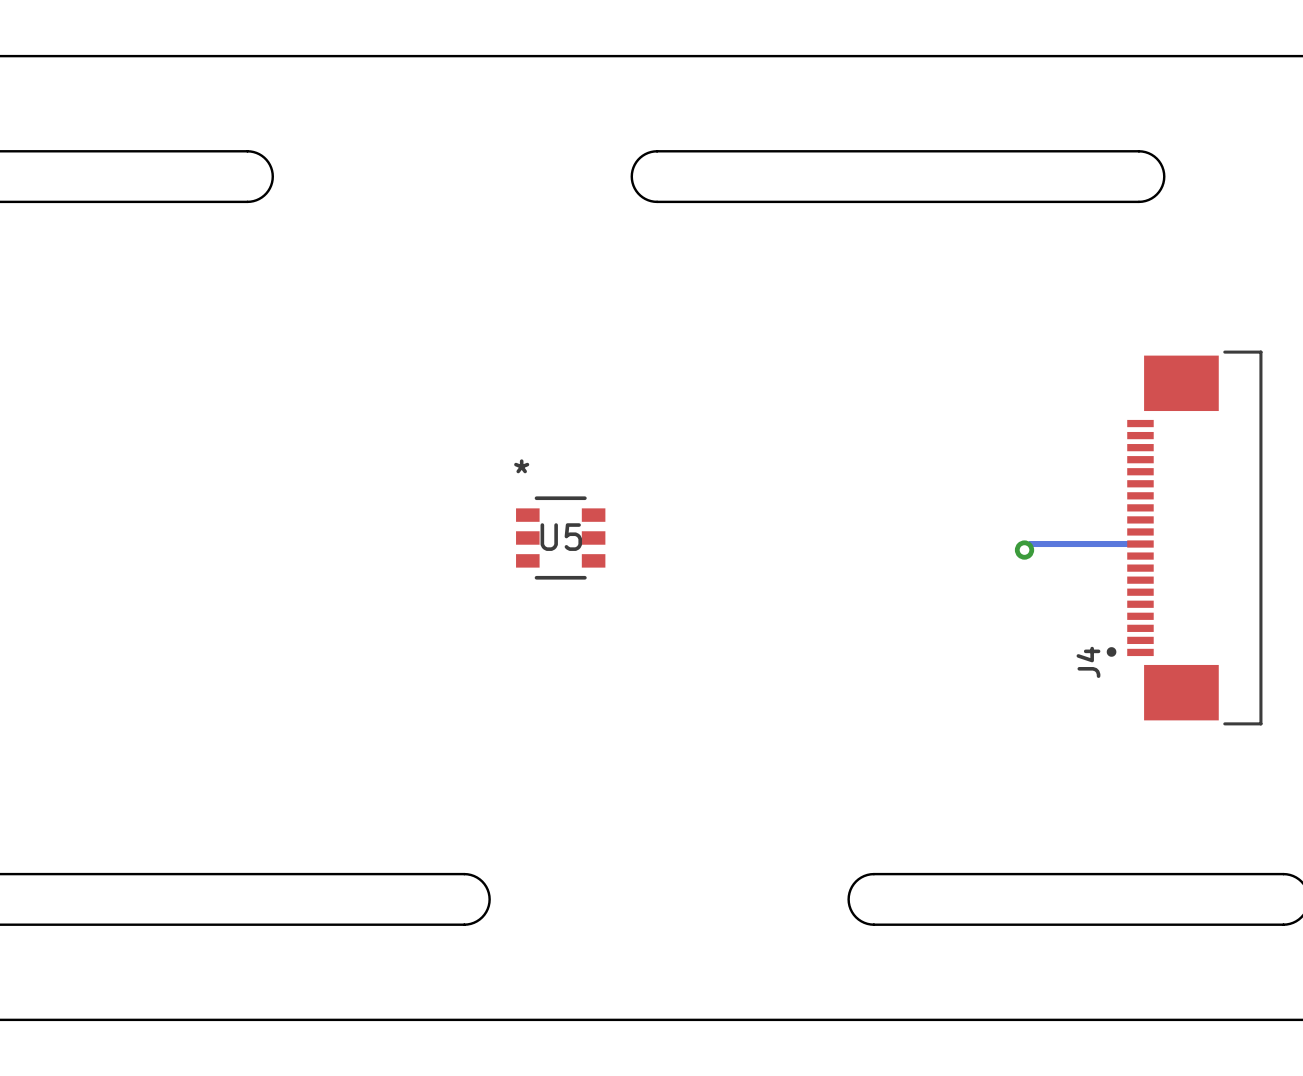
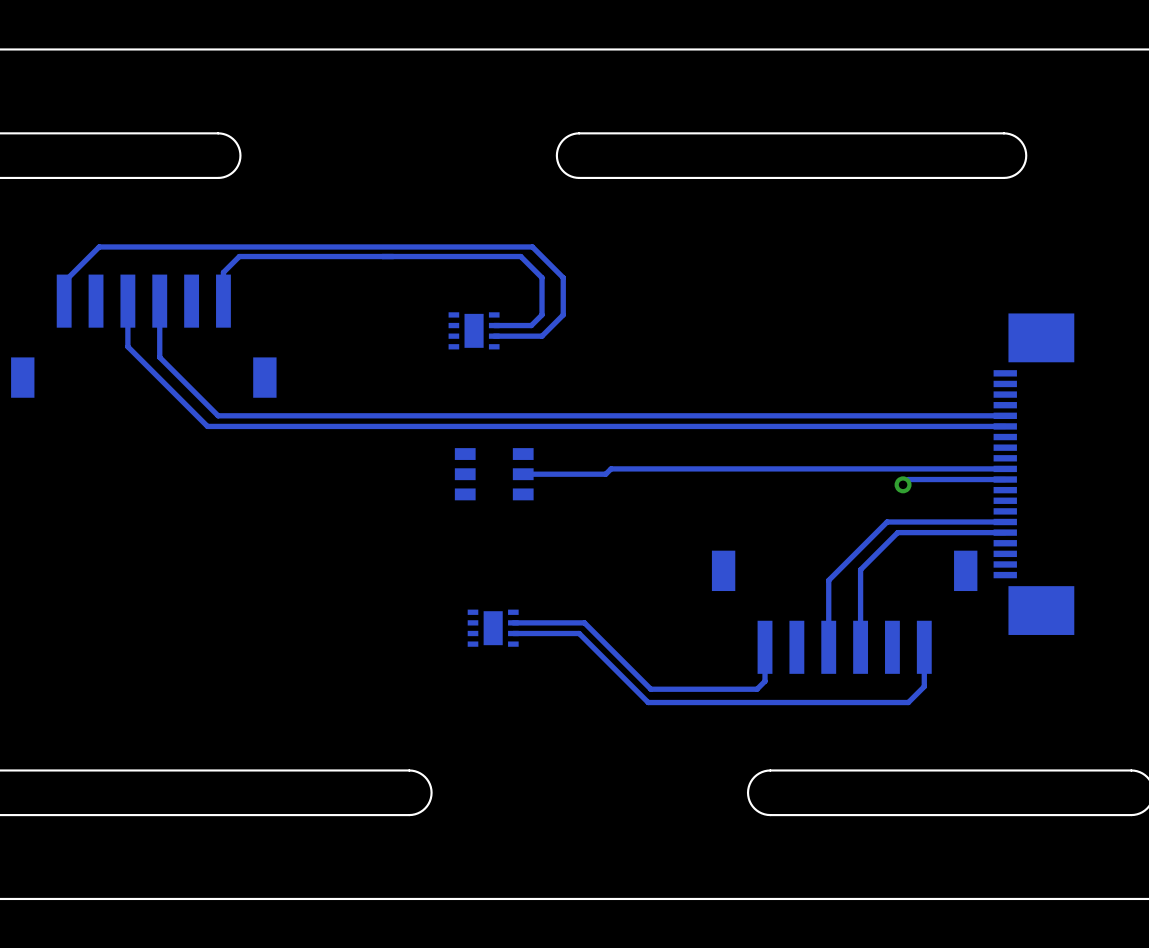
bottom track: none -> (64, 301) (64, 282) (99, 246) (532, 246) (563, 277) (563, 314) (542, 336) (494, 336)
bottom track: none -> (127, 301) (127, 346) (207, 426) (1005, 426)
bottom track: none -> (159, 301) (159, 357) (218, 415) (1005, 415)
bottom track: none -> (223, 301) (223, 272) (239, 256) (520, 256) (542, 277) (542, 314) (531, 325) (494, 325)
part: none -> (474, 330)
part: none -> (143, 336)
bottom track: none -> (1005, 468) (611, 468) (605, 474) (523, 474)
U5 side: top (560, 537) -> bottom (494, 474)
J4 side: top (1184, 537) -> bottom (1033, 474)
bottom track: none -> (1005, 522) (887, 522) (828, 580) (828, 647)
bottom track: none -> (1005, 532) (897, 532) (860, 569) (860, 647)
part: none -> (844, 612)
bottom track: none -> (513, 622) (584, 622) (650, 689) (757, 689) (765, 681) (765, 647)
part: none -> (493, 628)
bottom track: none -> (513, 633) (579, 633) (648, 702) (908, 702) (924, 686) (924, 647)

